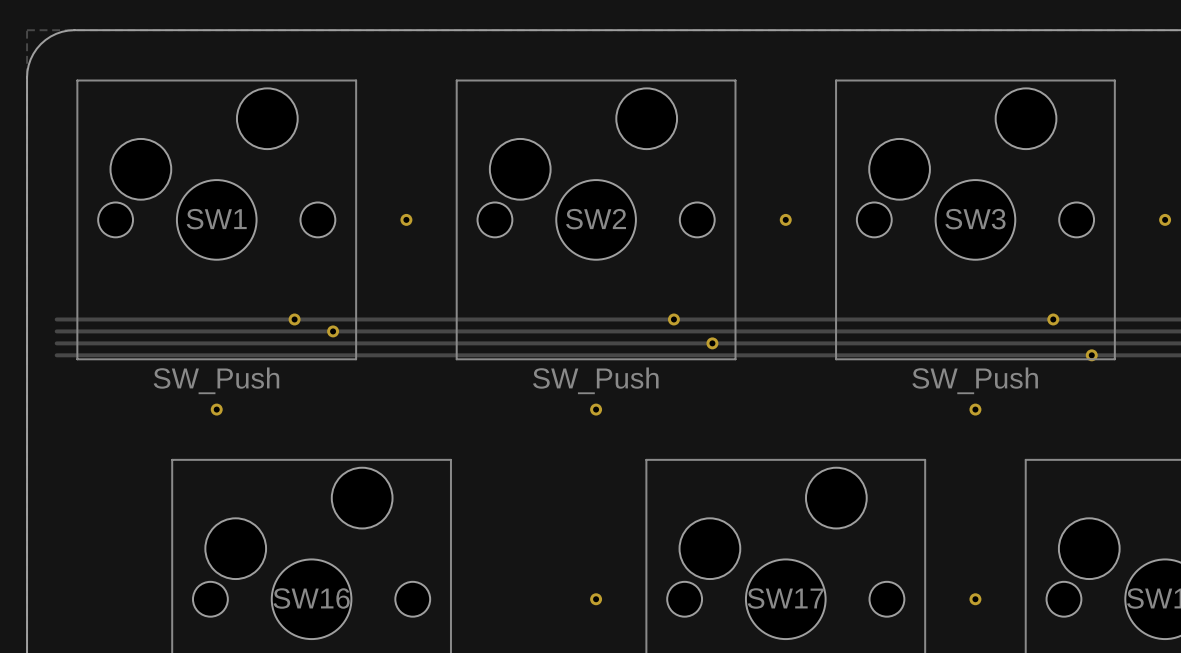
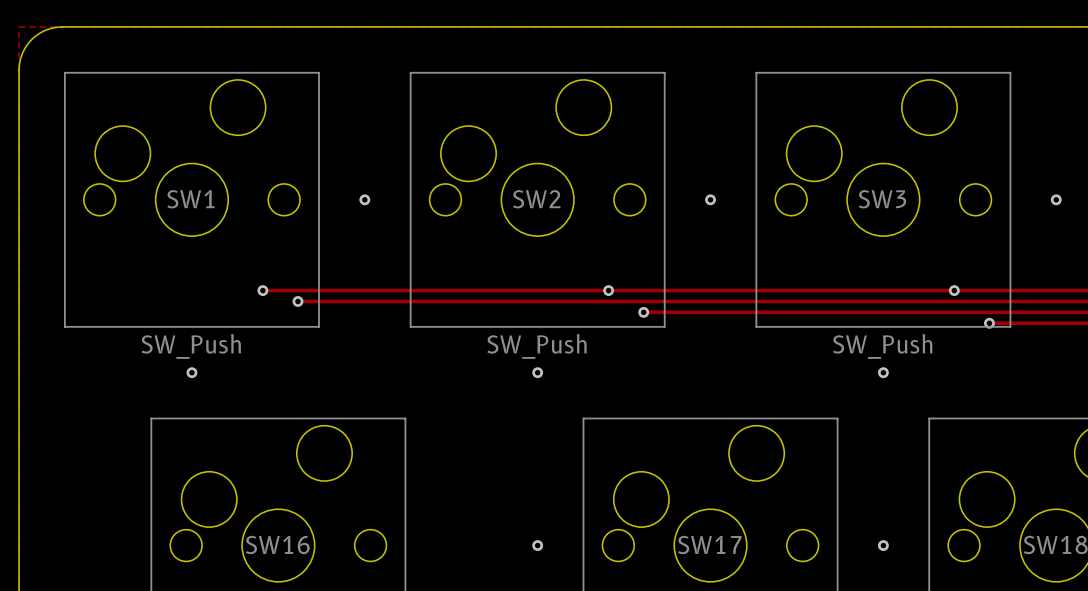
track: (56, 319) (294, 319) -> none
track: (56, 331) (333, 331) -> none
track: (56, 343) (712, 343) -> none
track: (56, 355) (1091, 355) -> none

